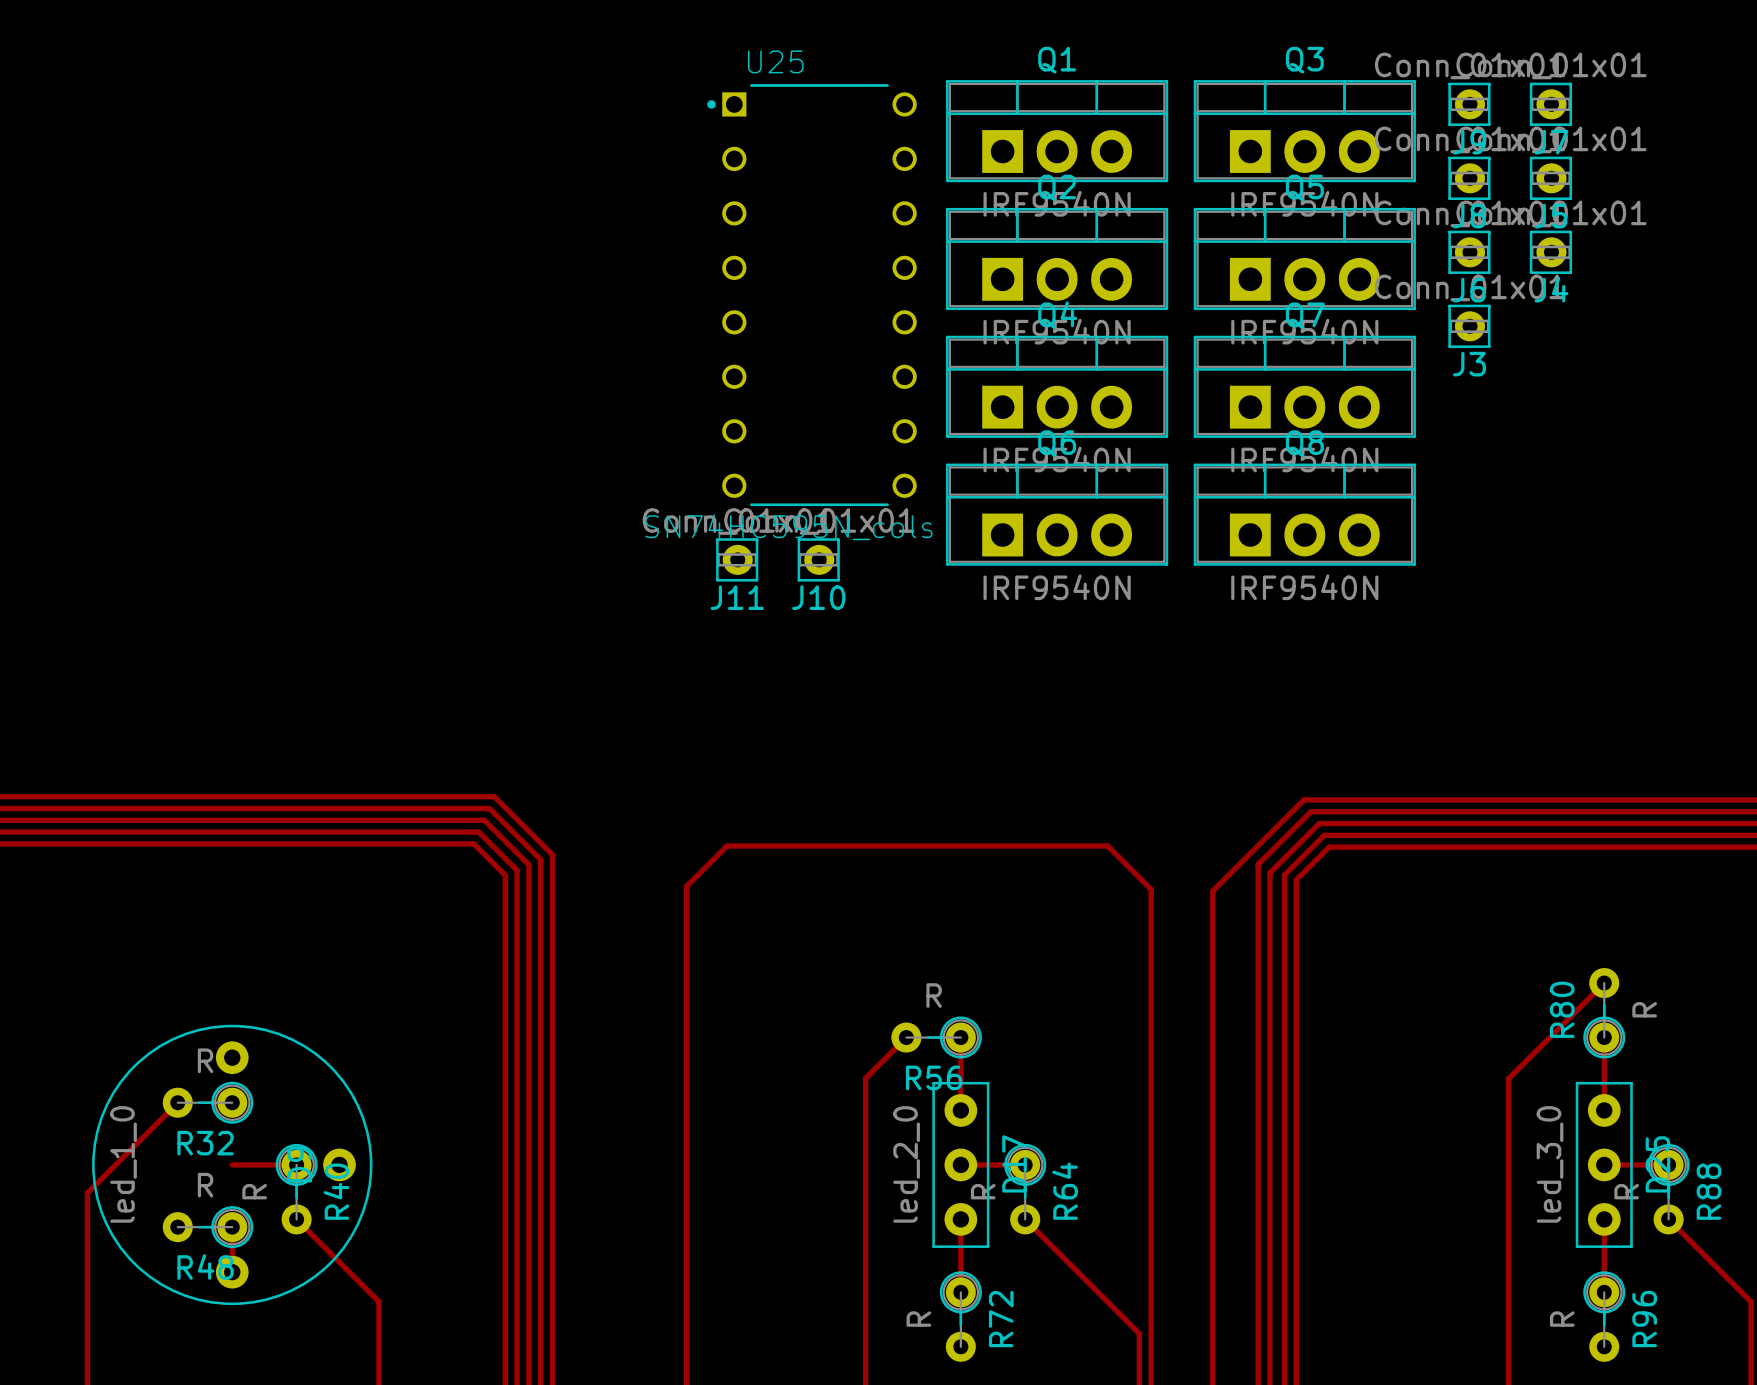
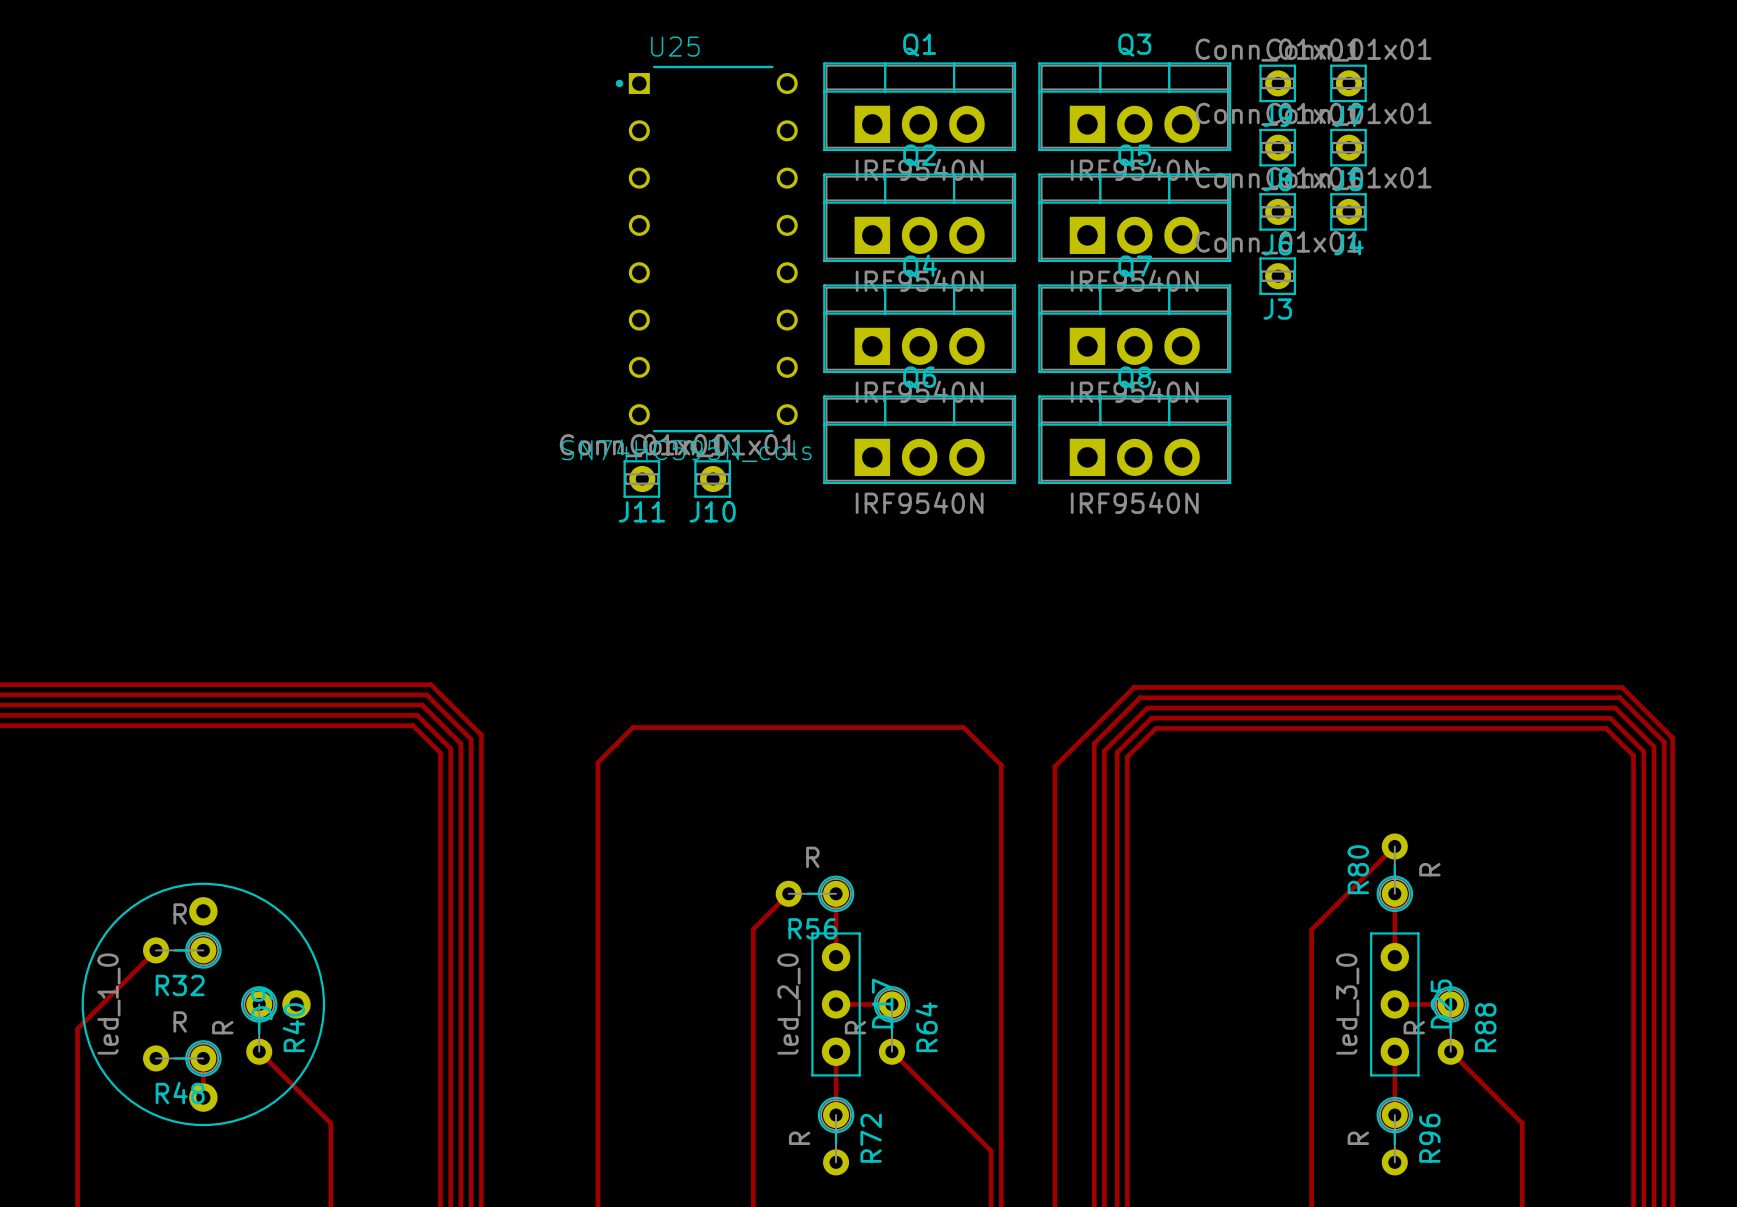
track: (232, 1164) (294, 1164) -> none

